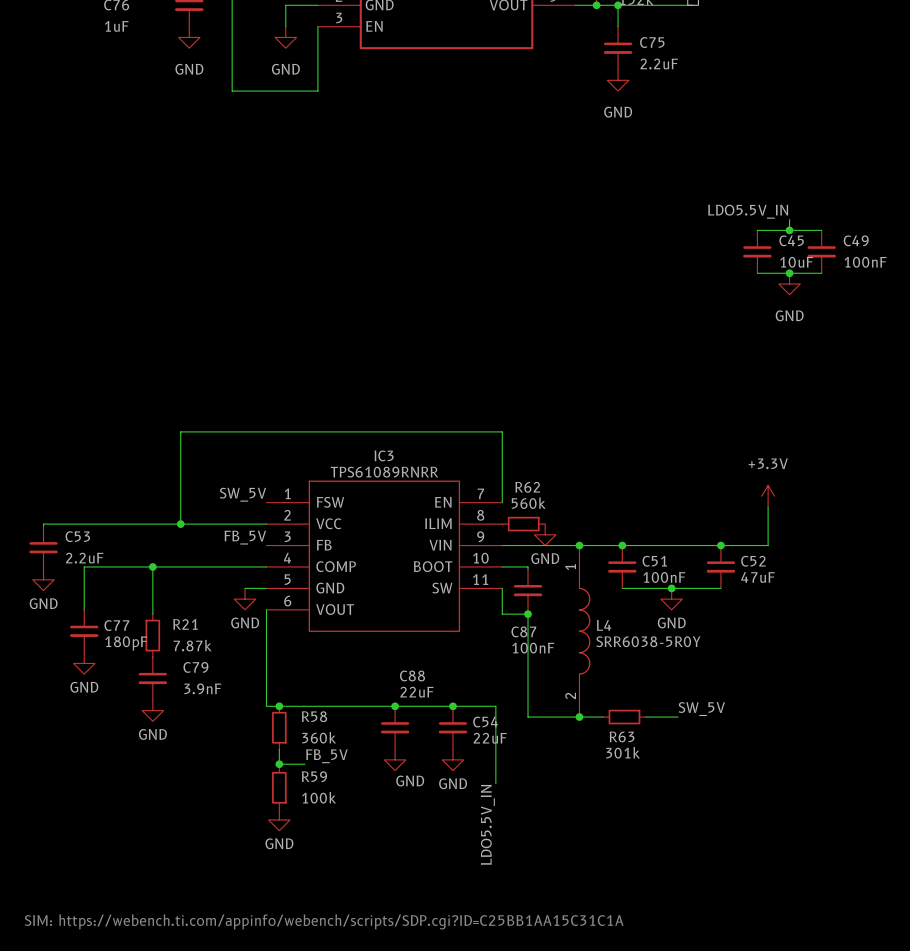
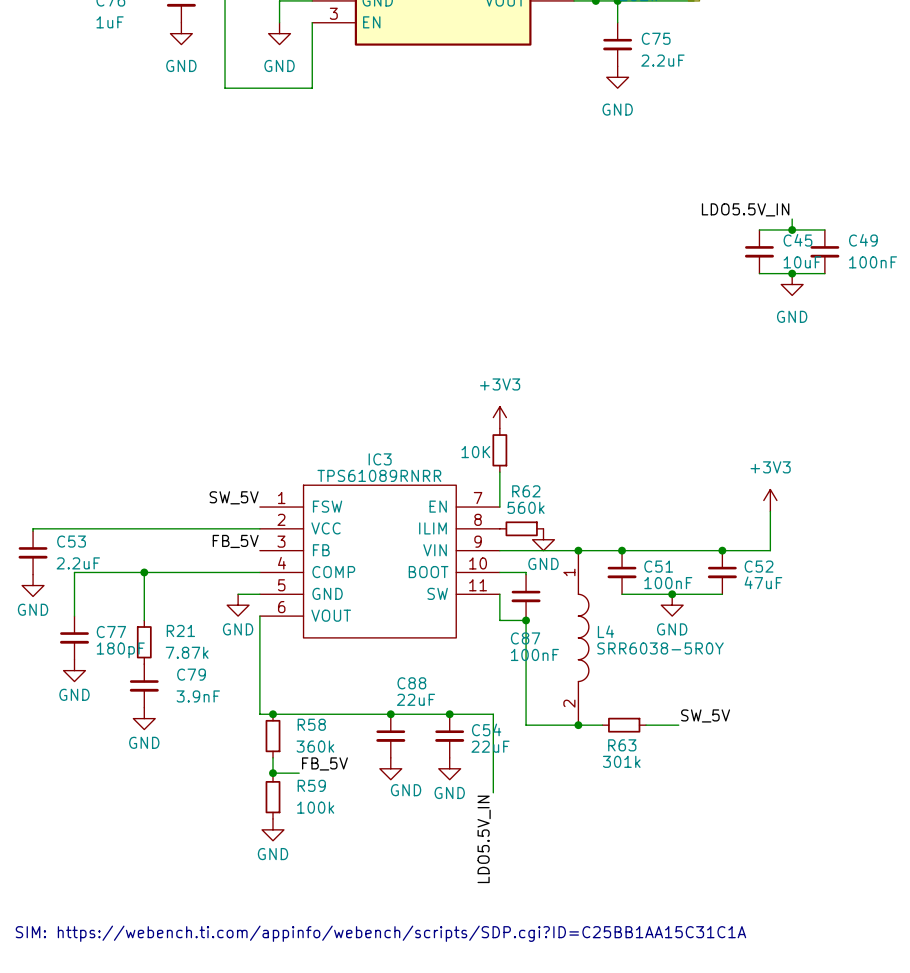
power symbol: none -> +3V3 (499, 417)
part: none -> 10K (499, 450)
wire: (502, 468) (502, 431) (180, 431) (180, 524) -> none
power symbol: +3.3V (768, 496) -> +3V3 (770, 500)
junction: (180, 524) -> none

